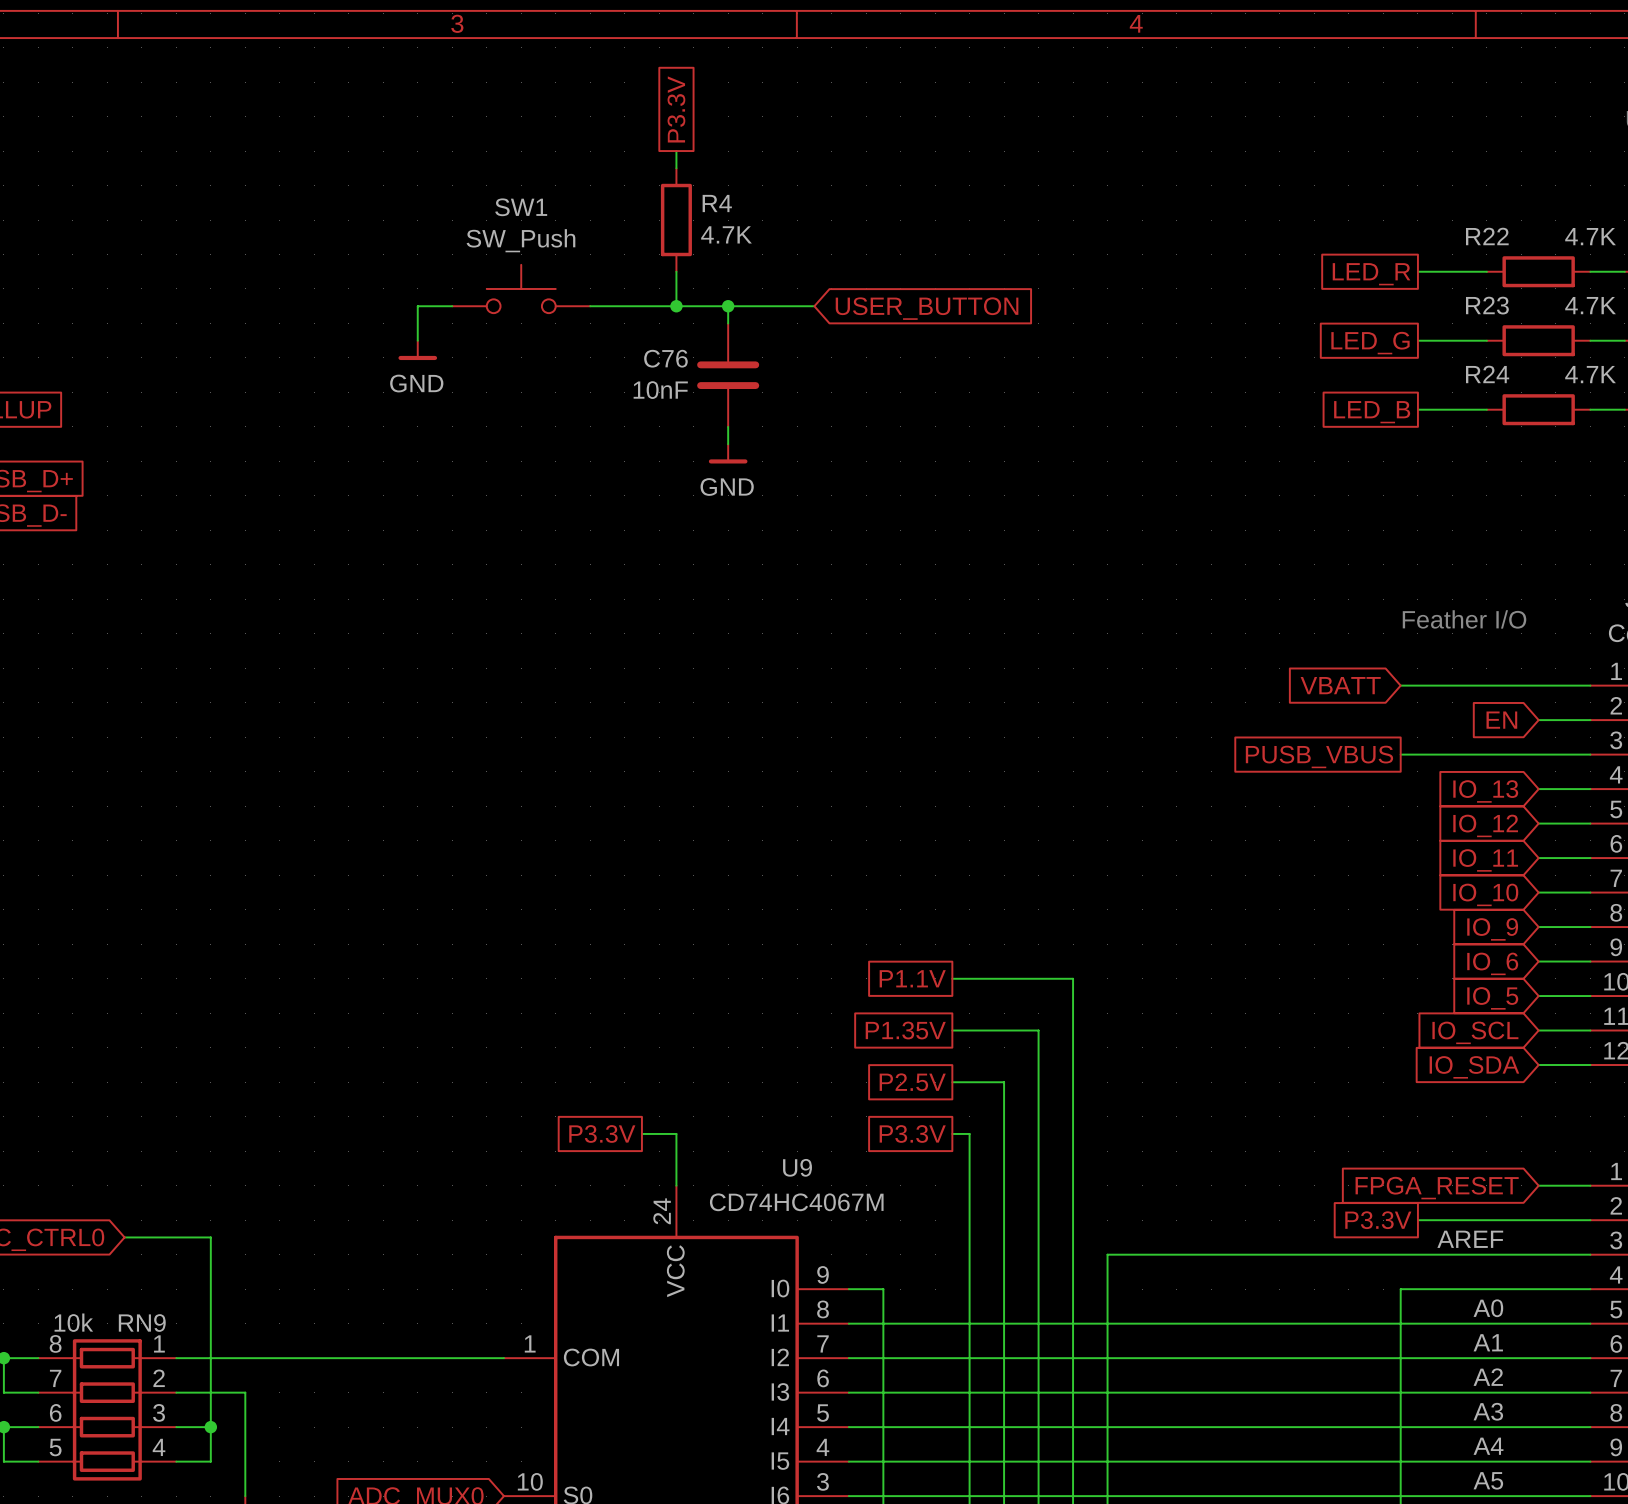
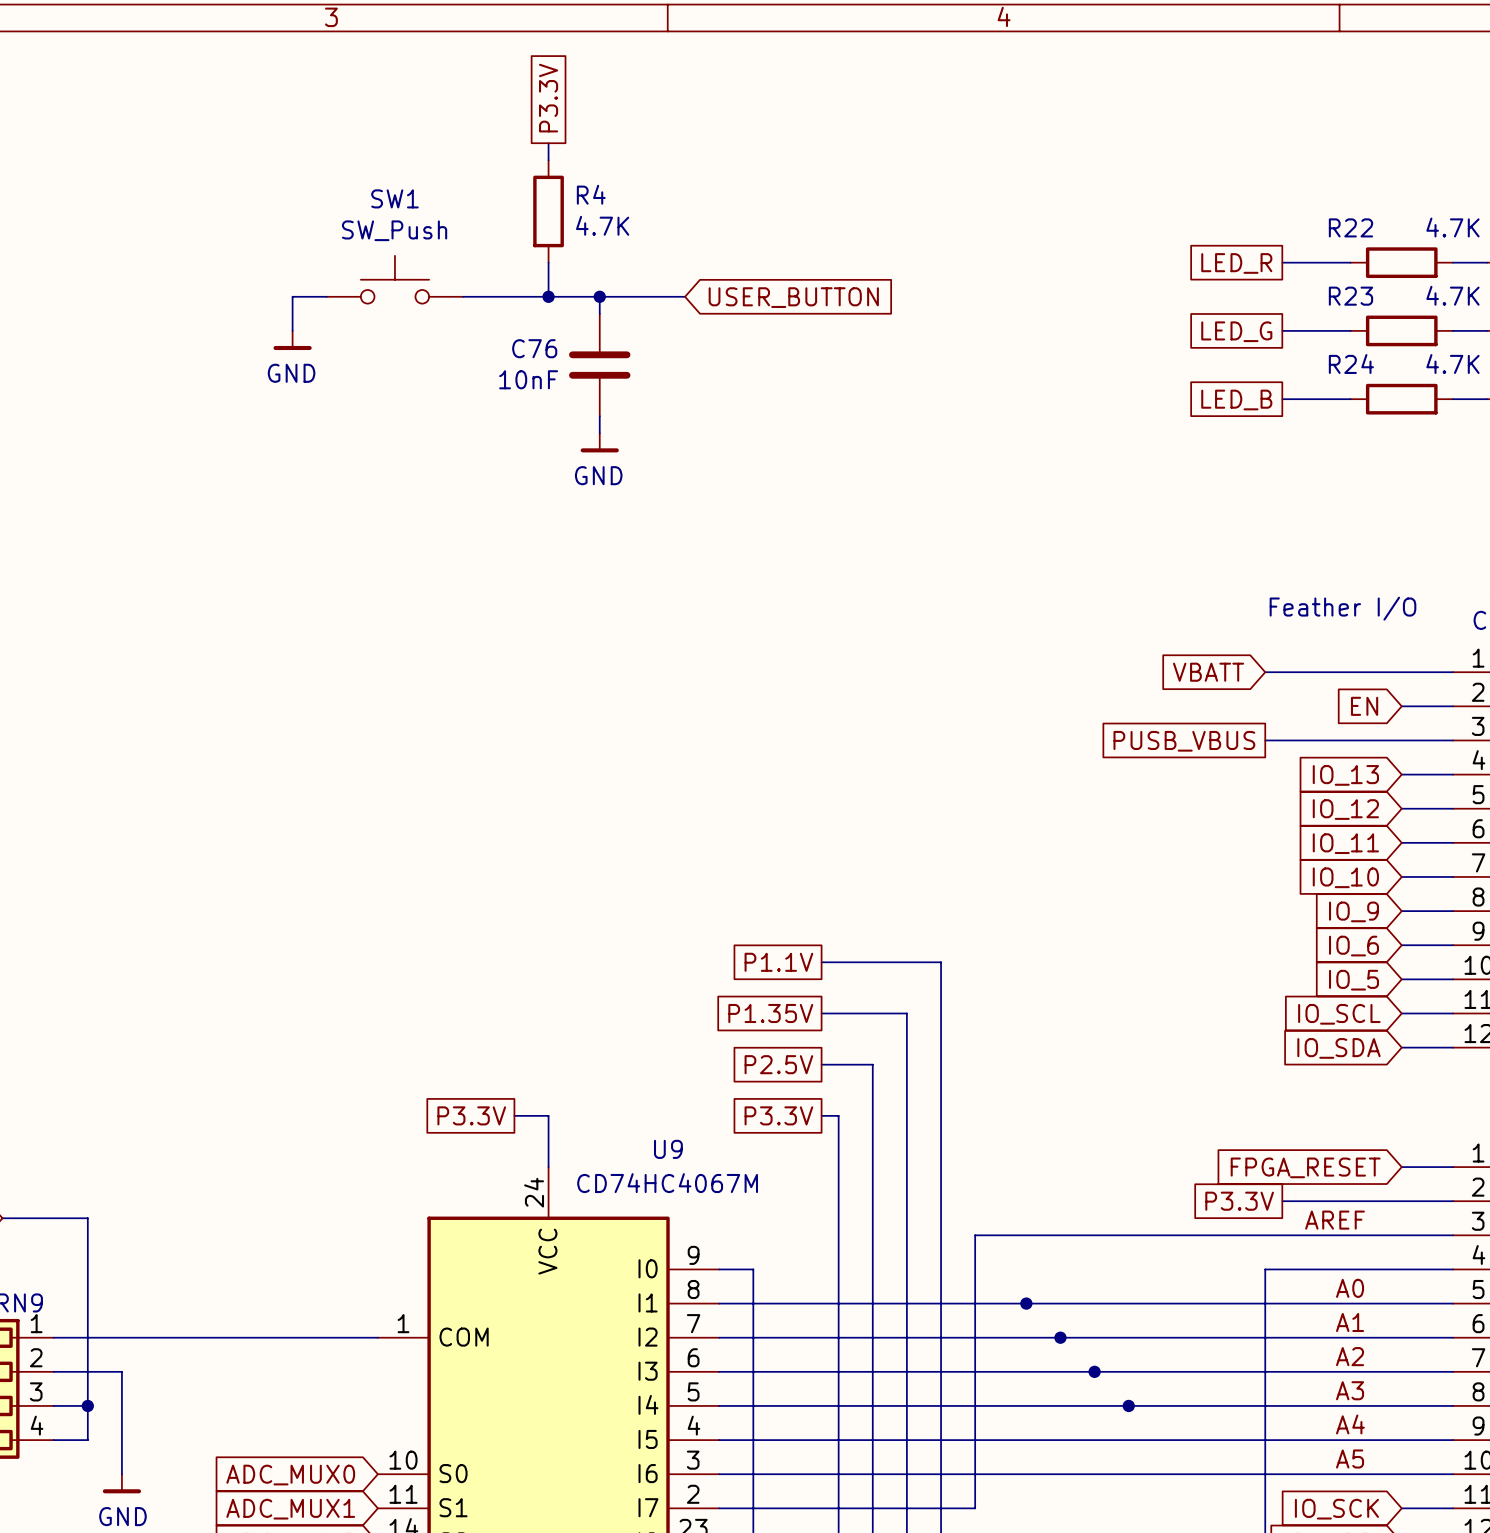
junction: none -> (1026, 1303)
junction: none -> (1060, 1337)
junction: none -> (1094, 1371)
junction: none -> (1128, 1405)

